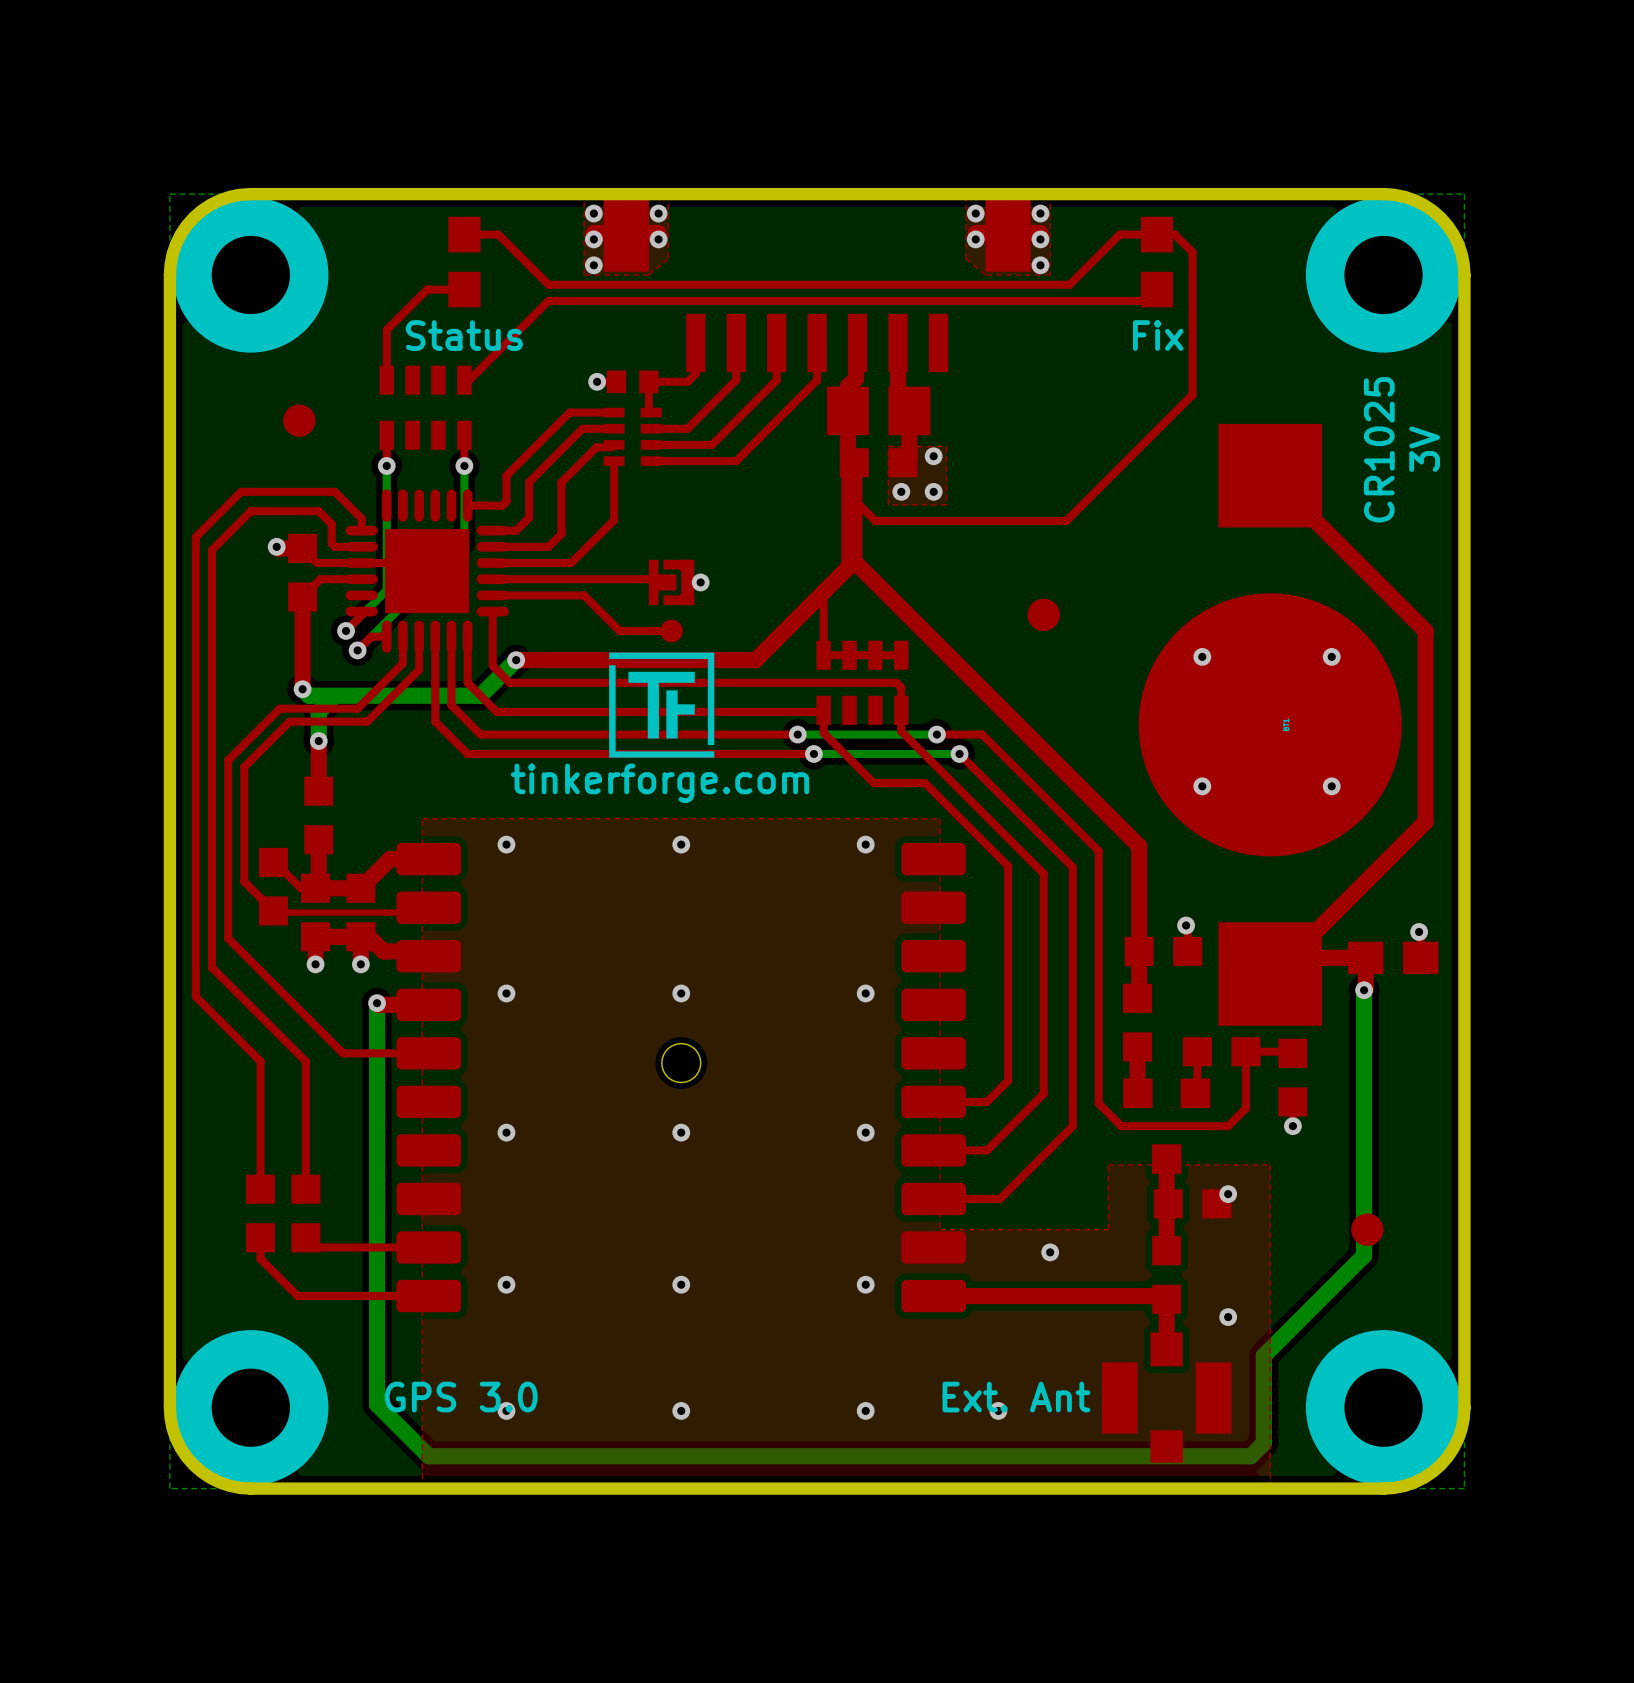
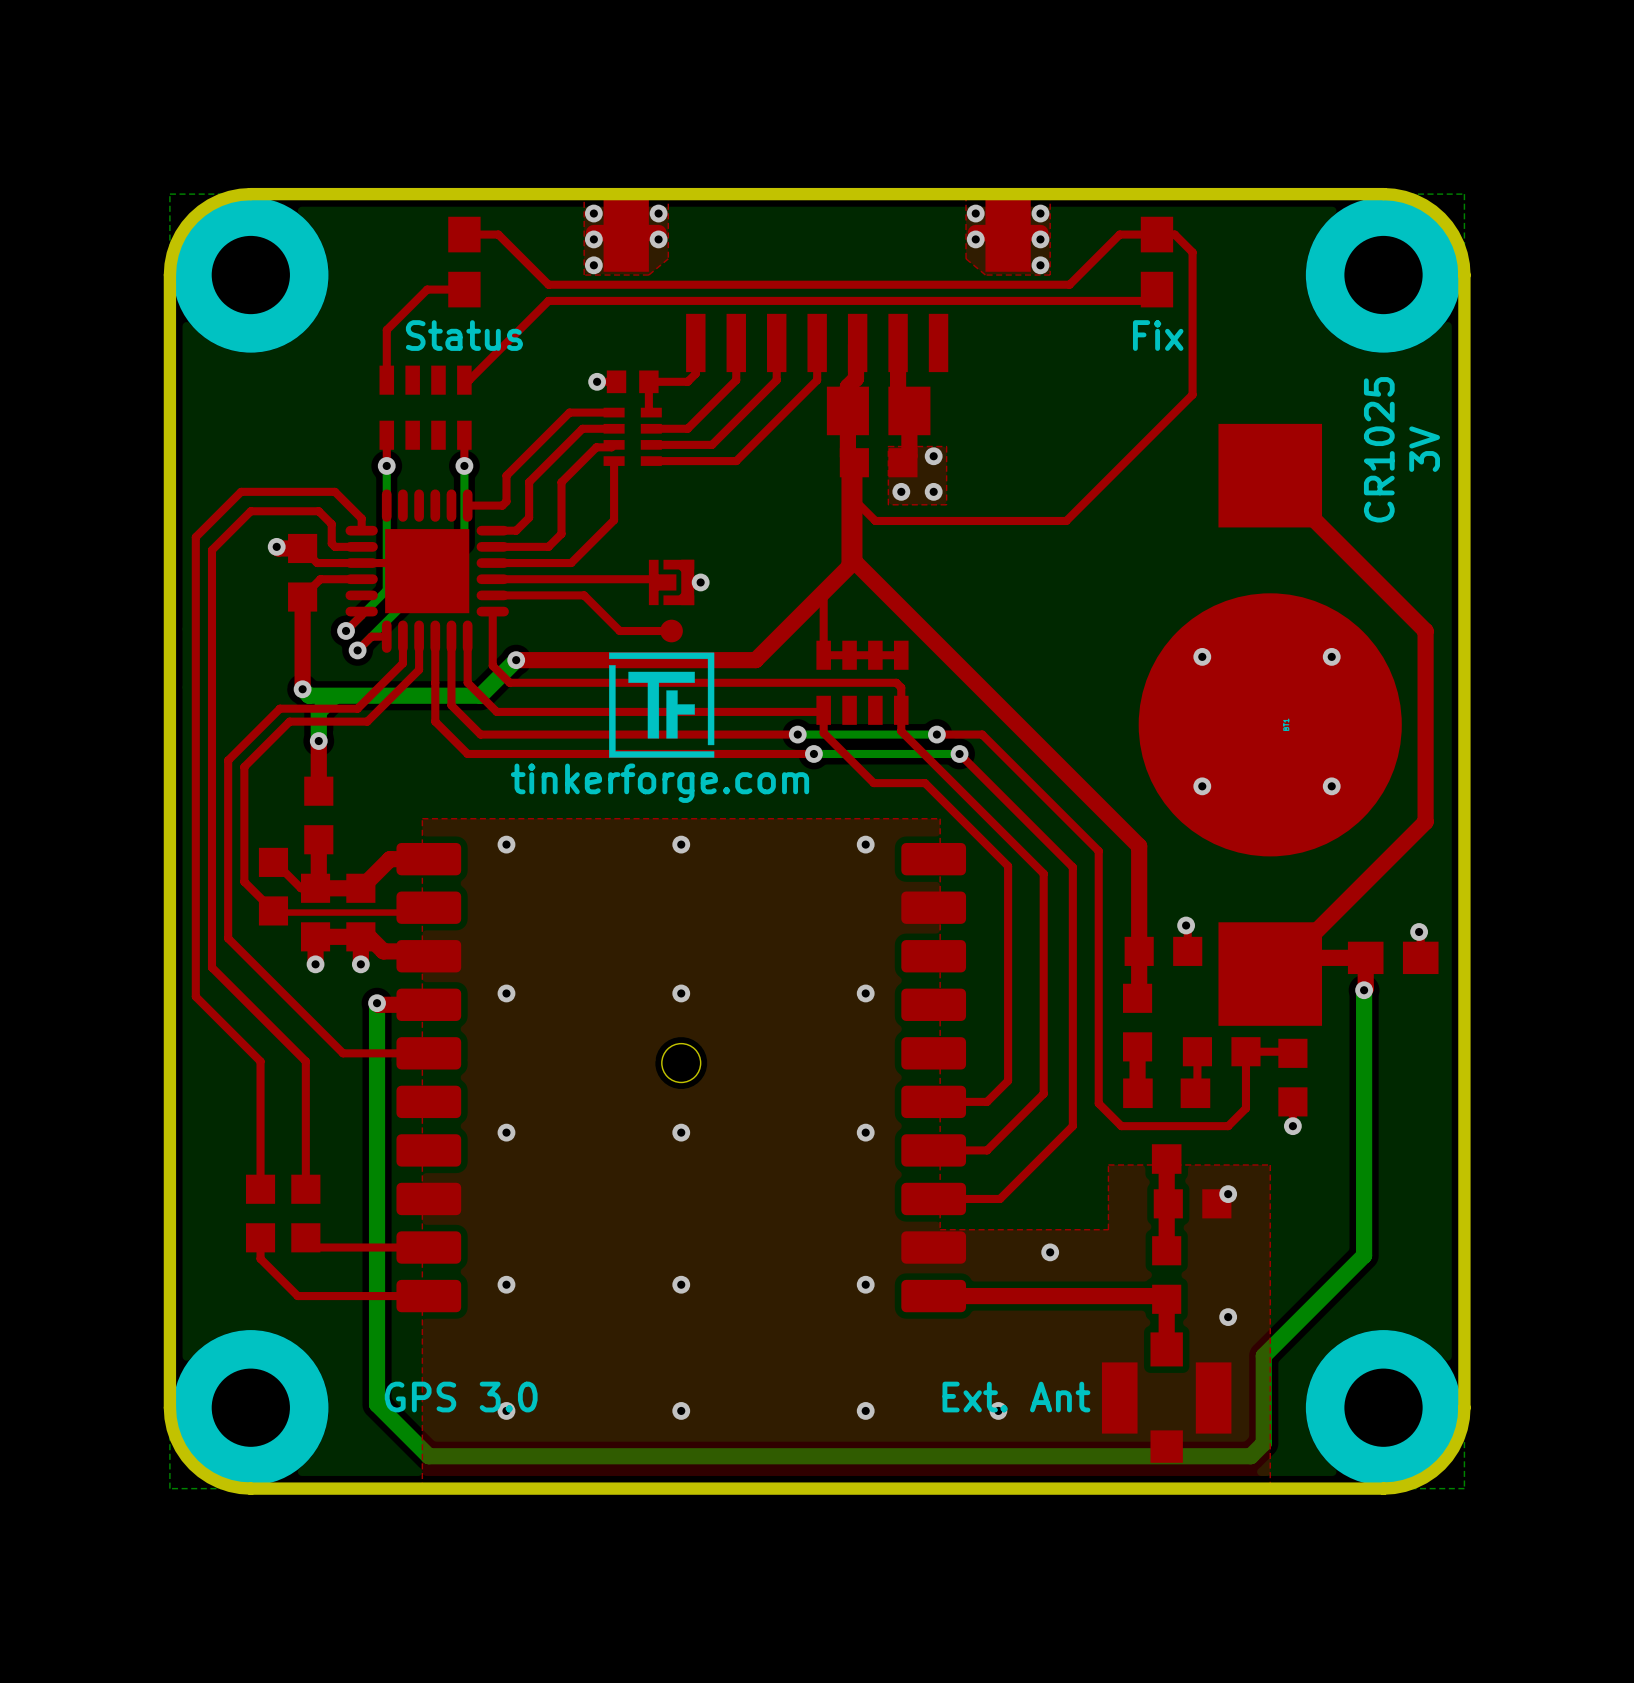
part: (299, 420) -> none
part: (1043, 614) -> none
part: (1367, 1229) -> none

